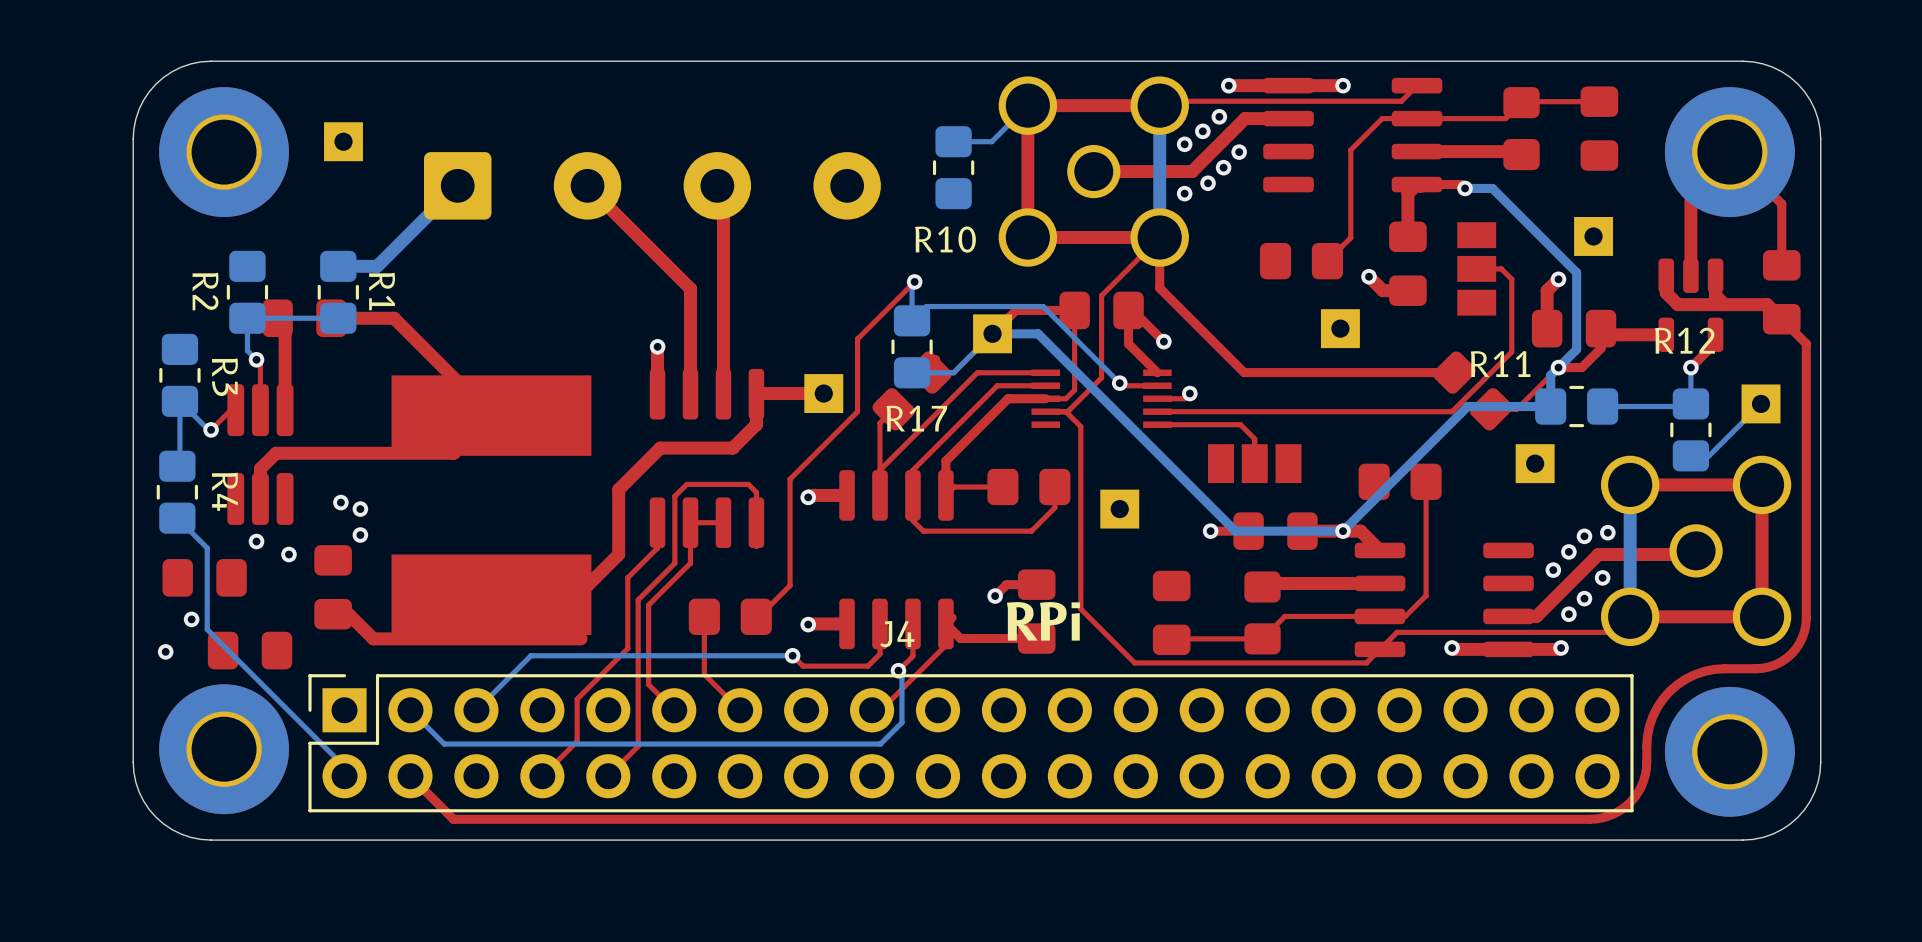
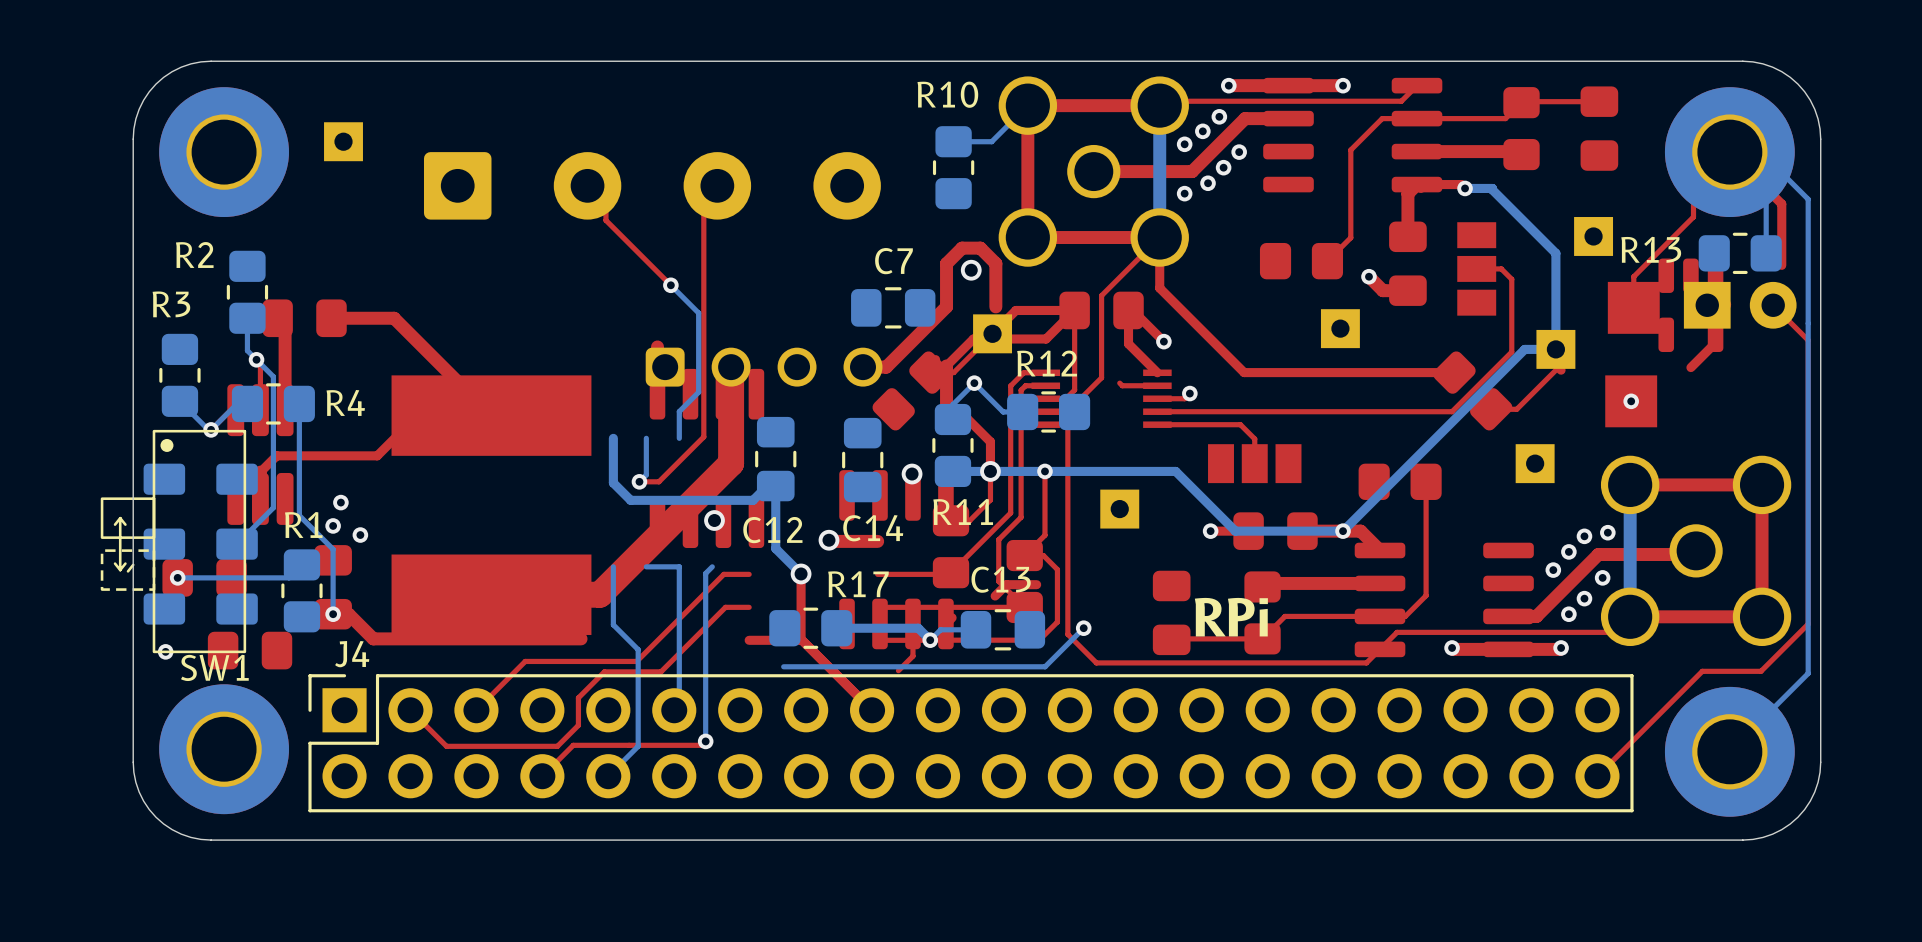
bottom track: (457, 185) (377, 266) (338, 266) -> none
top track: (717, 185) (723, 191) (723, 394) -> (717, 185) (703, 199) (703, 436) (658, 481) (639, 481)
bottom track: (1492, 188) (1576, 272) (1576, 349) (1550, 375) (1550, 406) (1467, 406) -> (1492, 188) (1555, 253) (1555, 349) (1524, 349) (1467, 406)
top track: (1693, 188) (1690, 191) (1690, 275) -> (1693, 188) (1693, 217) (1633, 276) (1633, 307)
top track: (605, 204) (690, 288) (690, 394) -> (605, 204) (605, 220) (670, 285)
R10 name position: R10 (945, 239) -> R10 (947, 94)
R13: none -> (1740, 253)
bottom track: none -> (1766, 253) (1766, 188) (1729, 152) (1761, 152) (1808, 199) (1808, 673) (1729, 751)
via: none -> (971, 270)
top track: (1666, 275) (1666, 292) (1677, 304) (1767, 304) (1806, 343) (1805, 624) (1802, 637) (1795, 649) (1786, 658) (1775, 664) (1762, 668) (1724, 668) (1704, 671) (1685, 679) (1669, 691) (1657, 707) (1649, 726) (1646, 768) (1641, 786) (1625, 806) (1608, 816) (1589, 819) (453, 819) (410, 776) -> none
top track: (1558, 279) (1547, 290) (1547, 328) -> none
via: (1558, 279) -> none
top track: (914, 281) (857, 339) (857, 411) (790, 479) (790, 585) (758, 616) (756, 616) -> none
bottom track: (914, 281) (912, 284) (912, 320) (926, 306) (1043, 306) (1119, 383) -> none
via: (914, 281) -> none
bottom track: none -> (670, 285) (698, 313) (698, 392) (679, 411) (679, 438)
R2 name rotation: 0° (205, 291) -> 90° counterclockwise (194, 255)
R1 name rotation: 0° (382, 291) -> 90° counterclockwise (303, 524)
R1 name position: R1 (382, 291) -> R1 (303, 524)
R1 position: (338, 292) -> (301, 590)
part: (1781, 292) -> none
part: none -> (1740, 305)
top track: none -> (1773, 305) (1808, 340) (1808, 624) (1761, 671) (1702, 671) (1597, 776)
top track: none -> (995, 306) (995, 263) (980, 248) (962, 248) (946, 263) (946, 306) (886, 367) (862, 367)
C7: none -> (893, 307)
part: none -> (1633, 307)
top track: none -> (1069, 315) (1046, 339) (973, 339) (946, 365) (946, 412) (952, 418) (967, 418) (990, 441) (990, 499) (969, 520) (951, 520)
bottom track: (338, 318) (247, 318) -> none
part: (1574, 328) -> none
top track: (1666, 334) (1607, 334) (1601, 328) (1601, 348) (1581, 367) (1558, 367) -> none
via position: (657, 346) -> (670, 285)
R17 rotation: 0° (912, 346) -> 90° clockwise (810, 628)
R17 position: (912, 346) -> (810, 628)
bottom track: none -> (256, 359) (273, 376) (273, 507) (237, 544)
R11 name position: R11 (1500, 364) -> R11 (963, 512)
top track: none -> (731, 367) (731, 463) (599, 594) (491, 594)
part: none -> (764, 367)
via: (1558, 367) -> none
bottom track: (1690, 367) (1690, 403) (1688, 406) (1602, 406) -> none
via: (1690, 367) -> none
bottom track: (912, 372) (953, 372) (992, 333) (1038, 333) (1175, 471) -> (952, 471) (1175, 471)
top track: (1023, 372) (977, 372) (880, 470) -> (1023, 372) (1010, 385) (1010, 512) (949, 574) (877, 574)
R3 name rotation: 0° (224, 377) -> 90° counterclockwise (171, 304)
R3 name position: R3 (224, 377) -> R3 (171, 304)
bottom track: none -> (974, 383) (952, 404) (952, 419)
bottom track: none -> (974, 383) (1003, 411) (1022, 411)
via: none -> (974, 383)
via: (1119, 383) -> none
top track: (1025, 385) (997, 385) (912, 470) (912, 520) (923, 531) (1031, 531) (1054, 507) (1054, 487) -> (1025, 385) (1021, 390) (1021, 517) (998, 539) (998, 581) (1024, 607)
top track: (823, 393) (757, 393) (756, 424) (732, 448) (660, 448) (618, 489) (618, 554) (578, 594) -> none
part: (823, 393) -> none
top track: (1045, 398) (1008, 398) (945, 460) (945, 495) (954, 487) (1002, 487) -> none
bottom track: (179, 401) (179, 463) (177, 466) -> none
part: none -> (1631, 401)
via: none -> (1631, 401)
bottom track: none -> (247, 403) (237, 403) (211, 429)
bottom track: none -> (299, 403) (299, 515) (333, 549) (333, 614)
bottom track: (1761, 403) (1709, 455) (1690, 455) -> none
part position: (1761, 403) -> (1555, 349)
R11 rotation: 0° (1576, 406) -> 90° clockwise (952, 445)
R11 position: (1576, 406) -> (952, 445)
top track: (893, 409) (880, 423) (880, 495) -> none
top track: (1067, 413) (1080, 426) (1080, 609) (1134, 662) -> (1067, 413) (1067, 634) (1096, 662) (1134, 662)
top track: (491, 415) (453, 453) (276, 453) (260, 468) (260, 472) -> (491, 415) (417, 415) (377, 455) (276, 455) (260, 472)
R17 name position: R17 (916, 418) -> R17 (858, 584)
R12 rotation: 0° (1690, 429) -> 90° clockwise (1048, 411)
R12 position: (1690, 429) -> (1048, 411)
bottom track: none -> (613, 438) (613, 482) (630, 500) (753, 500) (767, 486) (775, 486) (775, 548) (801, 573)
bottom track: none -> (646, 438) (646, 474) (639, 481)
C14: none -> (862, 460)
via: none -> (990, 471)
top track: none -> (1044, 471) (1044, 535) (1024, 555) (1043, 555) (1057, 569) (1057, 622) (1039, 640)
via: none -> (1044, 471)
via: none -> (912, 474)
via: none -> (639, 481)
part: (1028, 487) -> none
R4 rotation: 0° (177, 492) -> 90° clockwise (273, 403)
R4 position: (177, 492) -> (273, 403)
top track: (847, 495) (810, 495) (808, 497) -> none
via: (808, 497) -> none
via: (360, 509) -> none
bottom track: (177, 518) (207, 548) (207, 629) (344, 766) -> none
via: none -> (714, 520)
top track: (657, 522) (657, 548) (627, 577) (627, 648) (604, 671) -> (749, 607) (725, 607) (661, 671) (604, 671)
top track: (723, 522) (690, 522) (690, 563) (648, 605) (648, 684) (674, 710) -> none
via: none -> (333, 525)
top track: none -> (828, 540) (877, 541)
via: none -> (828, 540)
SW1: none -> (179, 541)
via: (256, 541) -> none
top track: (756, 546) (756, 492) (748, 484) (686, 484) (674, 496) (674, 563) (638, 599) (638, 746) (608, 776) -> none
part: none -> (951, 546)
via: (288, 554) -> none
bottom track: none -> (301, 564) (288, 577) (177, 577)
bottom track: none -> (613, 566) (613, 624) (638, 649) (638, 746) (608, 776)
bottom track: none -> (646, 566) (679, 566) (679, 705) (674, 710)
bottom track: none -> (712, 566) (705, 573) (705, 741)
top track: none -> (801, 573) (801, 639) (872, 710)
via: none -> (801, 573)
top track: none -> (749, 574) (723, 574) (636, 661) (525, 661) (476, 710)
via: none -> (177, 577)
part: none -> (1024, 581)
via: (995, 596) -> none
top track: none -> (1015, 606) (877, 607)
C12 side: top (1036, 611) -> bottom (775, 459)
via: none -> (333, 614)
top track: (704, 616) (704, 674) (740, 710) -> none
part: (730, 616) -> none
via: (191, 619) -> none
text position: RPi (1043, 621) -> RPi (1231, 617)
top track: (847, 623) (808, 624) -> none
top track: (880, 623) (880, 654) (867, 666) (803, 666) (792, 655) -> none
via: (808, 624) -> none
bottom track: none -> (836, 628) (918, 628) (930, 640) (940, 629) (975, 629)
bottom track: none -> (1083, 628) (1045, 666) (783, 666)
via: none -> (1083, 628)
C13: none -> (1002, 629)
J4 name position: J4 (897, 634) -> J4 (352, 654)
top track: (1036, 638) (960, 638) (945, 623) (945, 645) (880, 710) -> none
top track: none -> (802, 640) (749, 640)
via: none -> (930, 640)
bottom track: (792, 655) (530, 655) (476, 710) -> none
via: (792, 655) -> none
bottom track: (898, 670) (901, 674) (901, 722) (880, 744) (444, 744) (410, 710) -> none
via: (898, 670) -> none
top track: (578, 697) (577, 741) (573, 745) -> (705, 741) (701, 745) (573, 745)
top track: none -> (578, 697) (578, 725) (557, 746) (446, 746) (410, 710)
via: none -> (705, 741)

